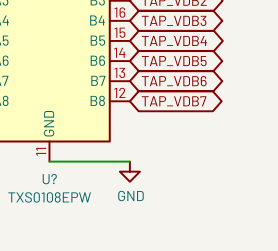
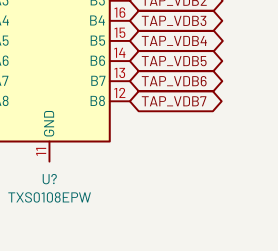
wire: (49, 161) (129, 161) -> none
power symbol: GND (129, 171) -> none

